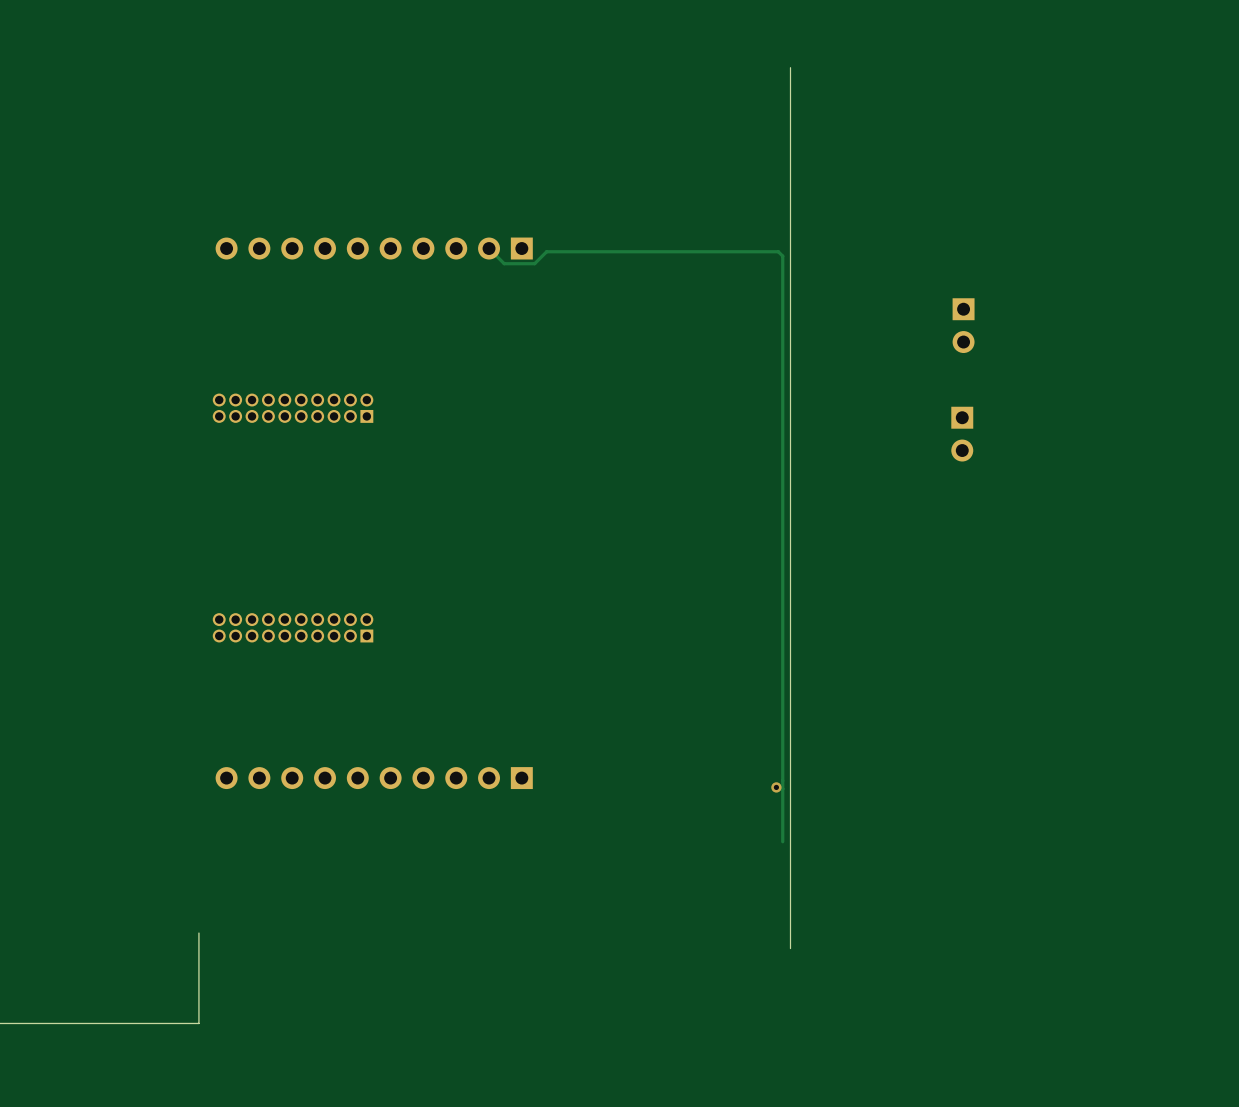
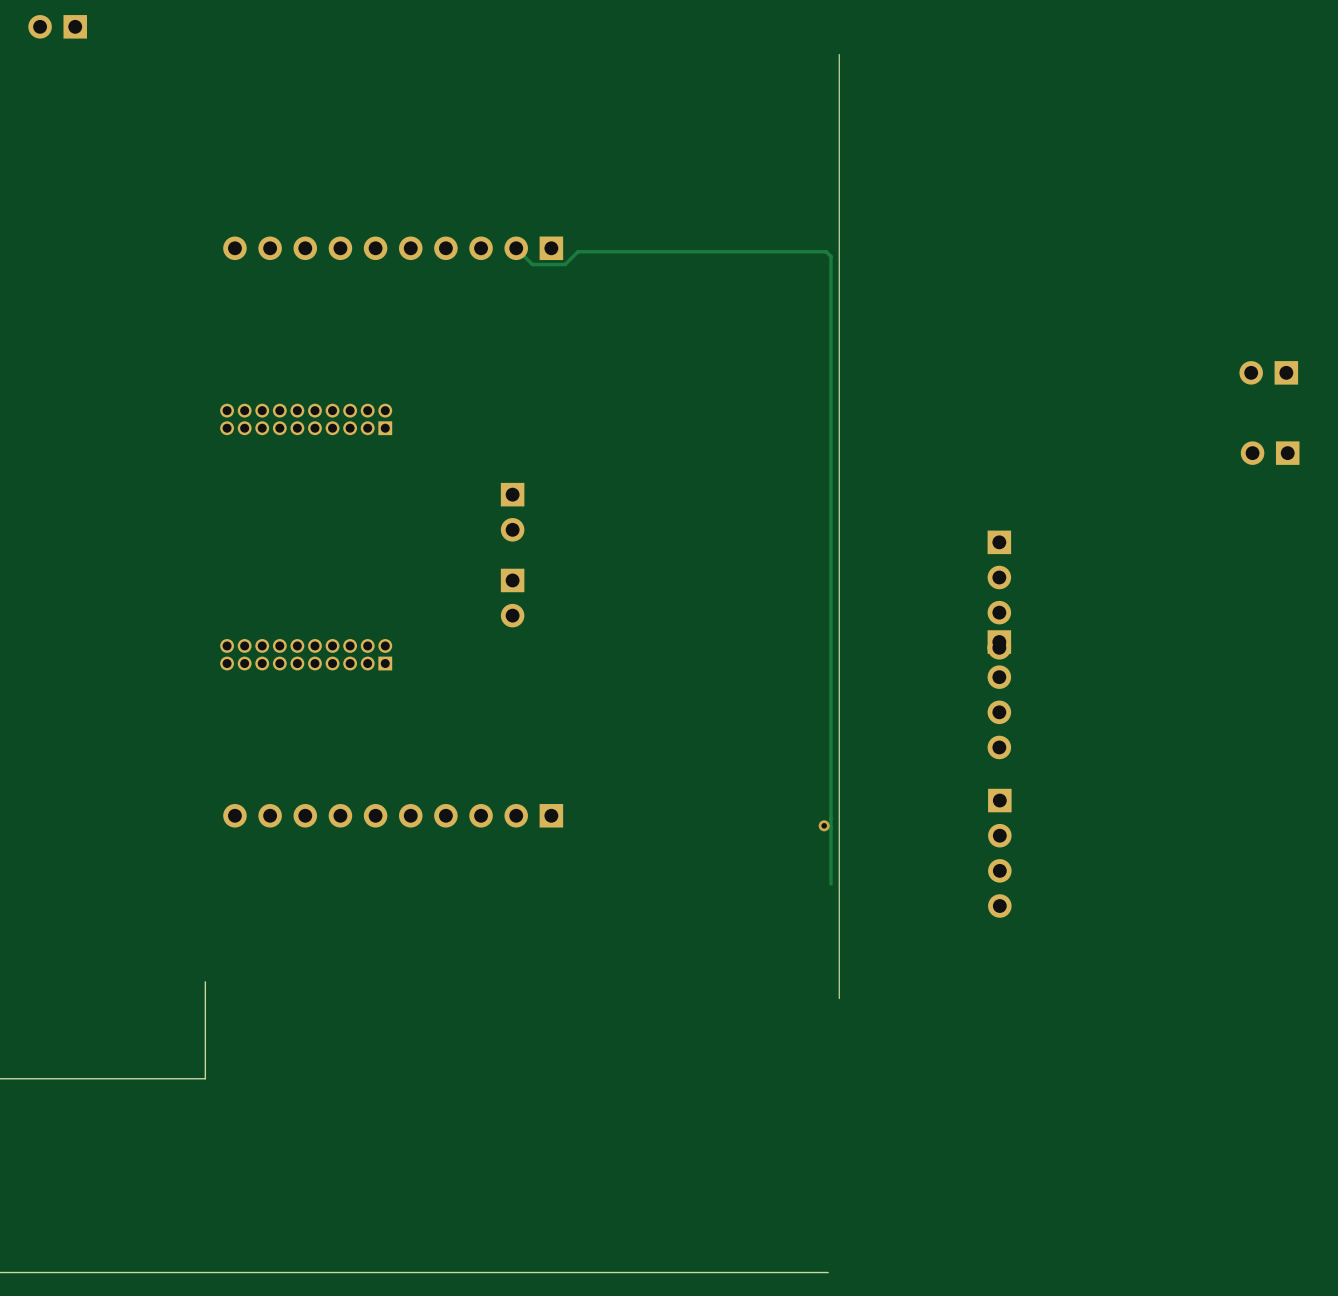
part: none -> (57, 26)
part: (963, 325) -> none
part: none -> (1268, 372)
part: (962, 434) -> none
part: none -> (1270, 453)
part: none -> (512, 512)
part: none -> (999, 595)
part: none -> (512, 598)
part: none -> (999, 694)
part: none -> (999, 853)

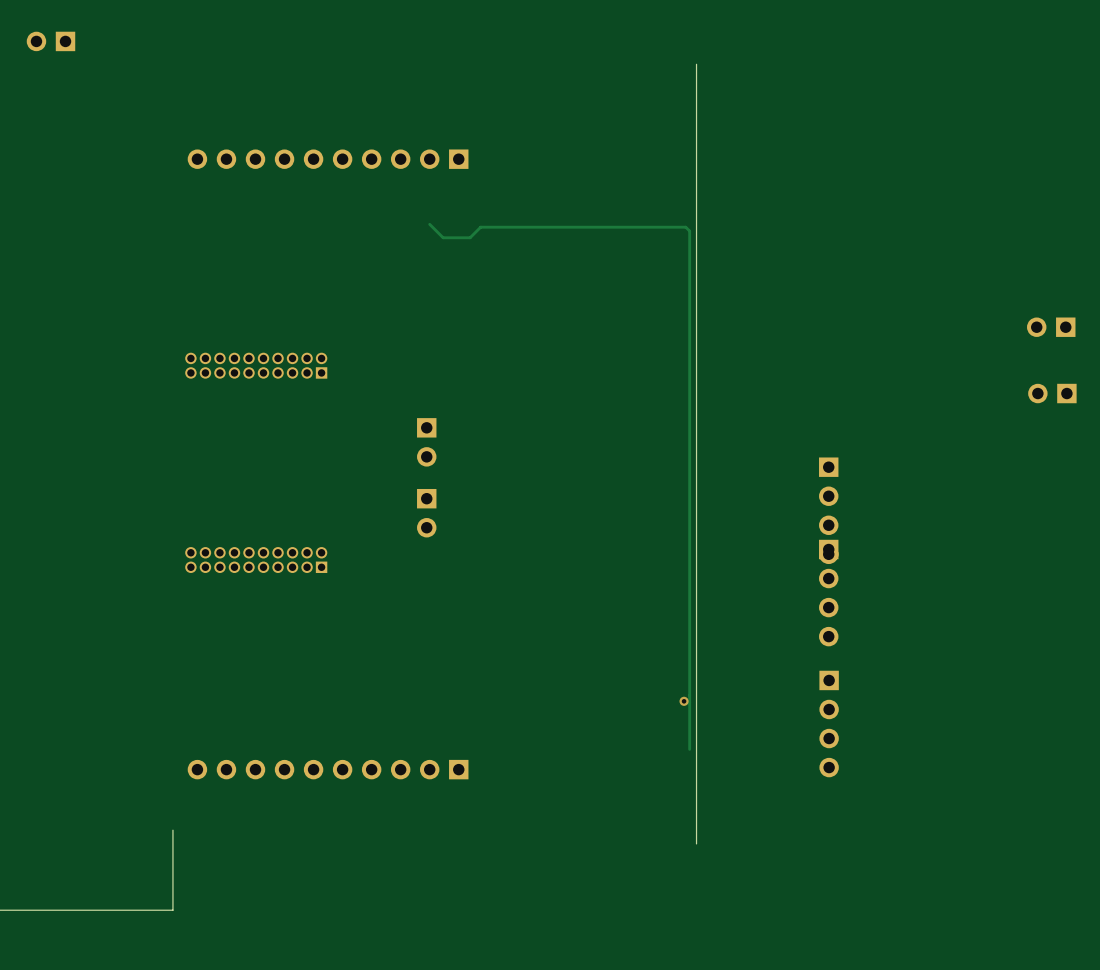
part position: (393, 248) -> (328, 159)
part position: (393, 815) -> (328, 769)

